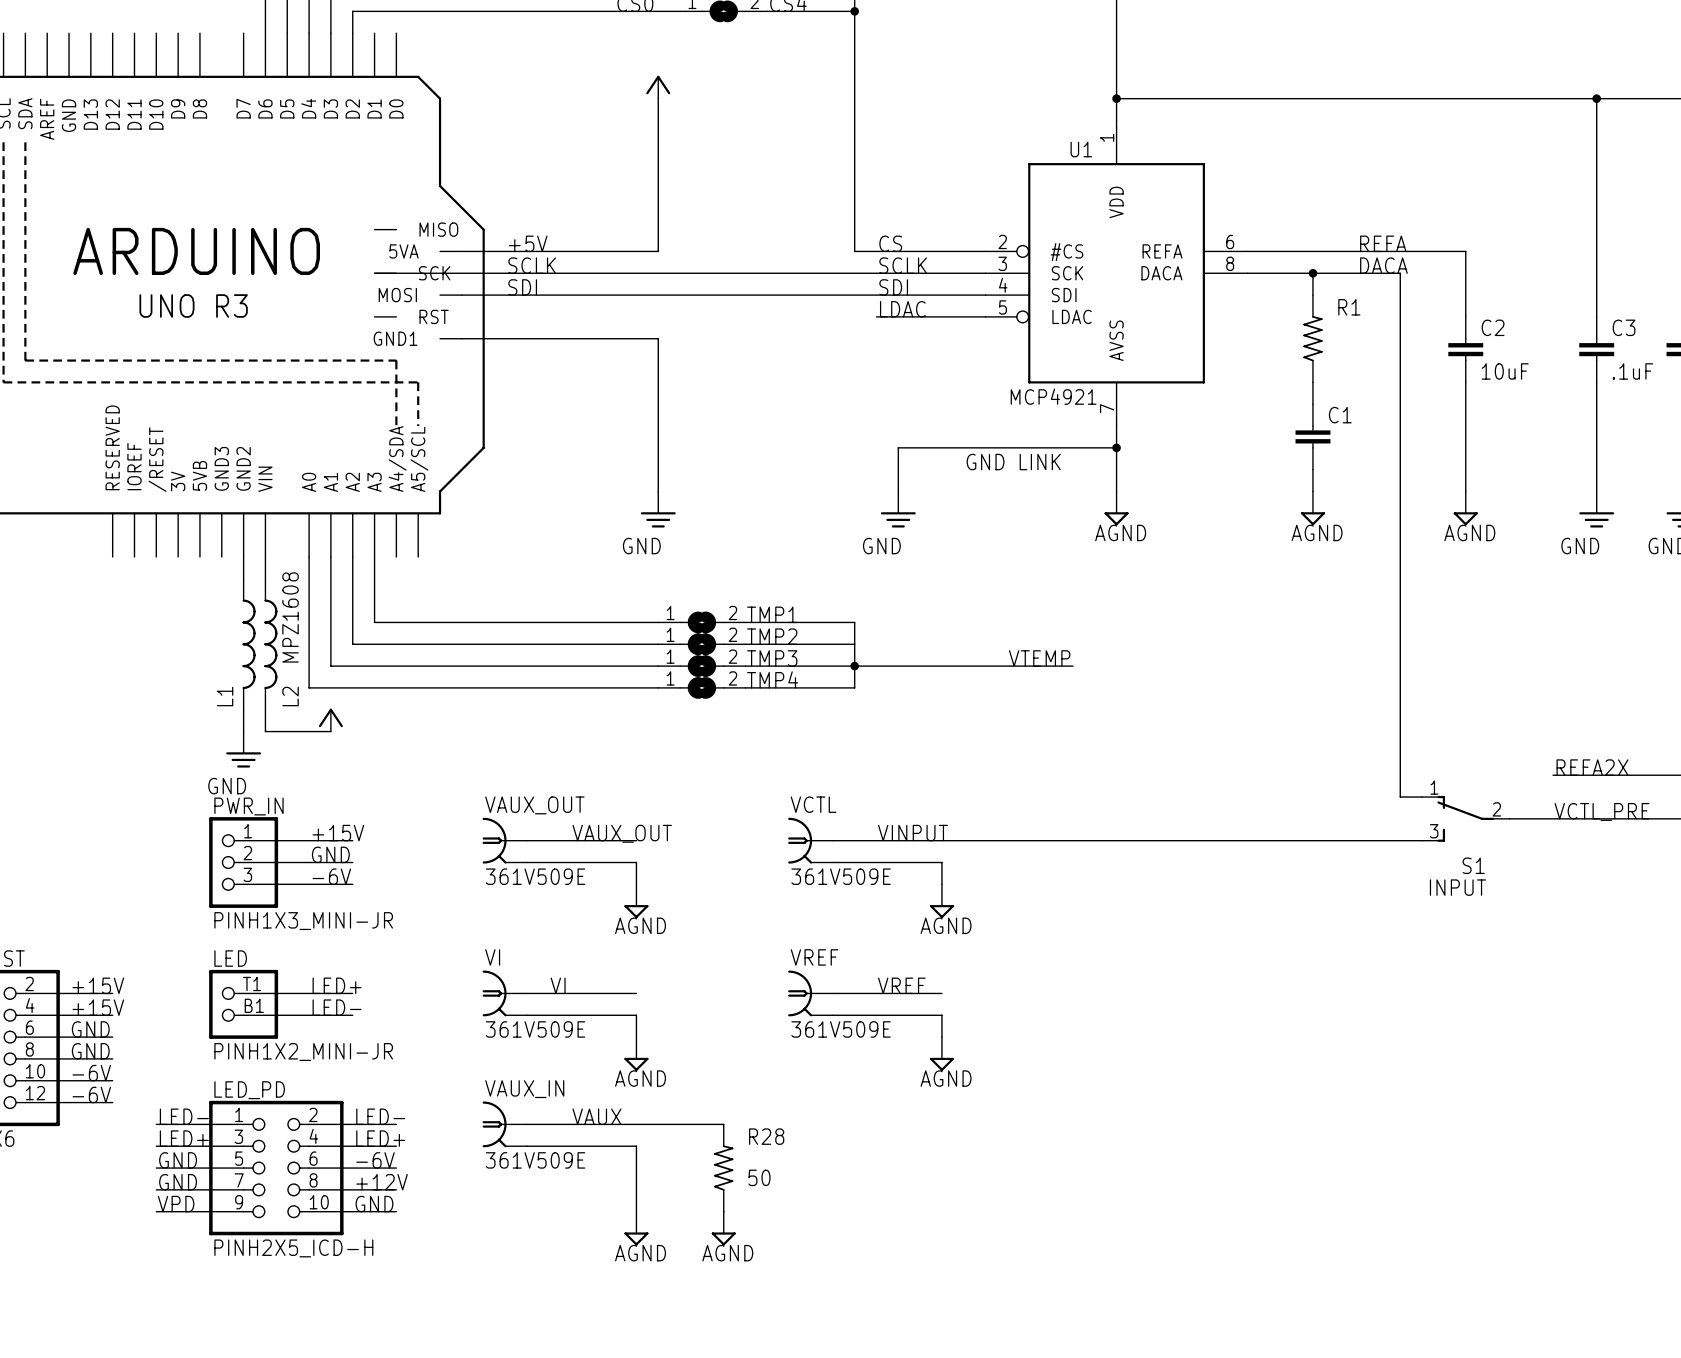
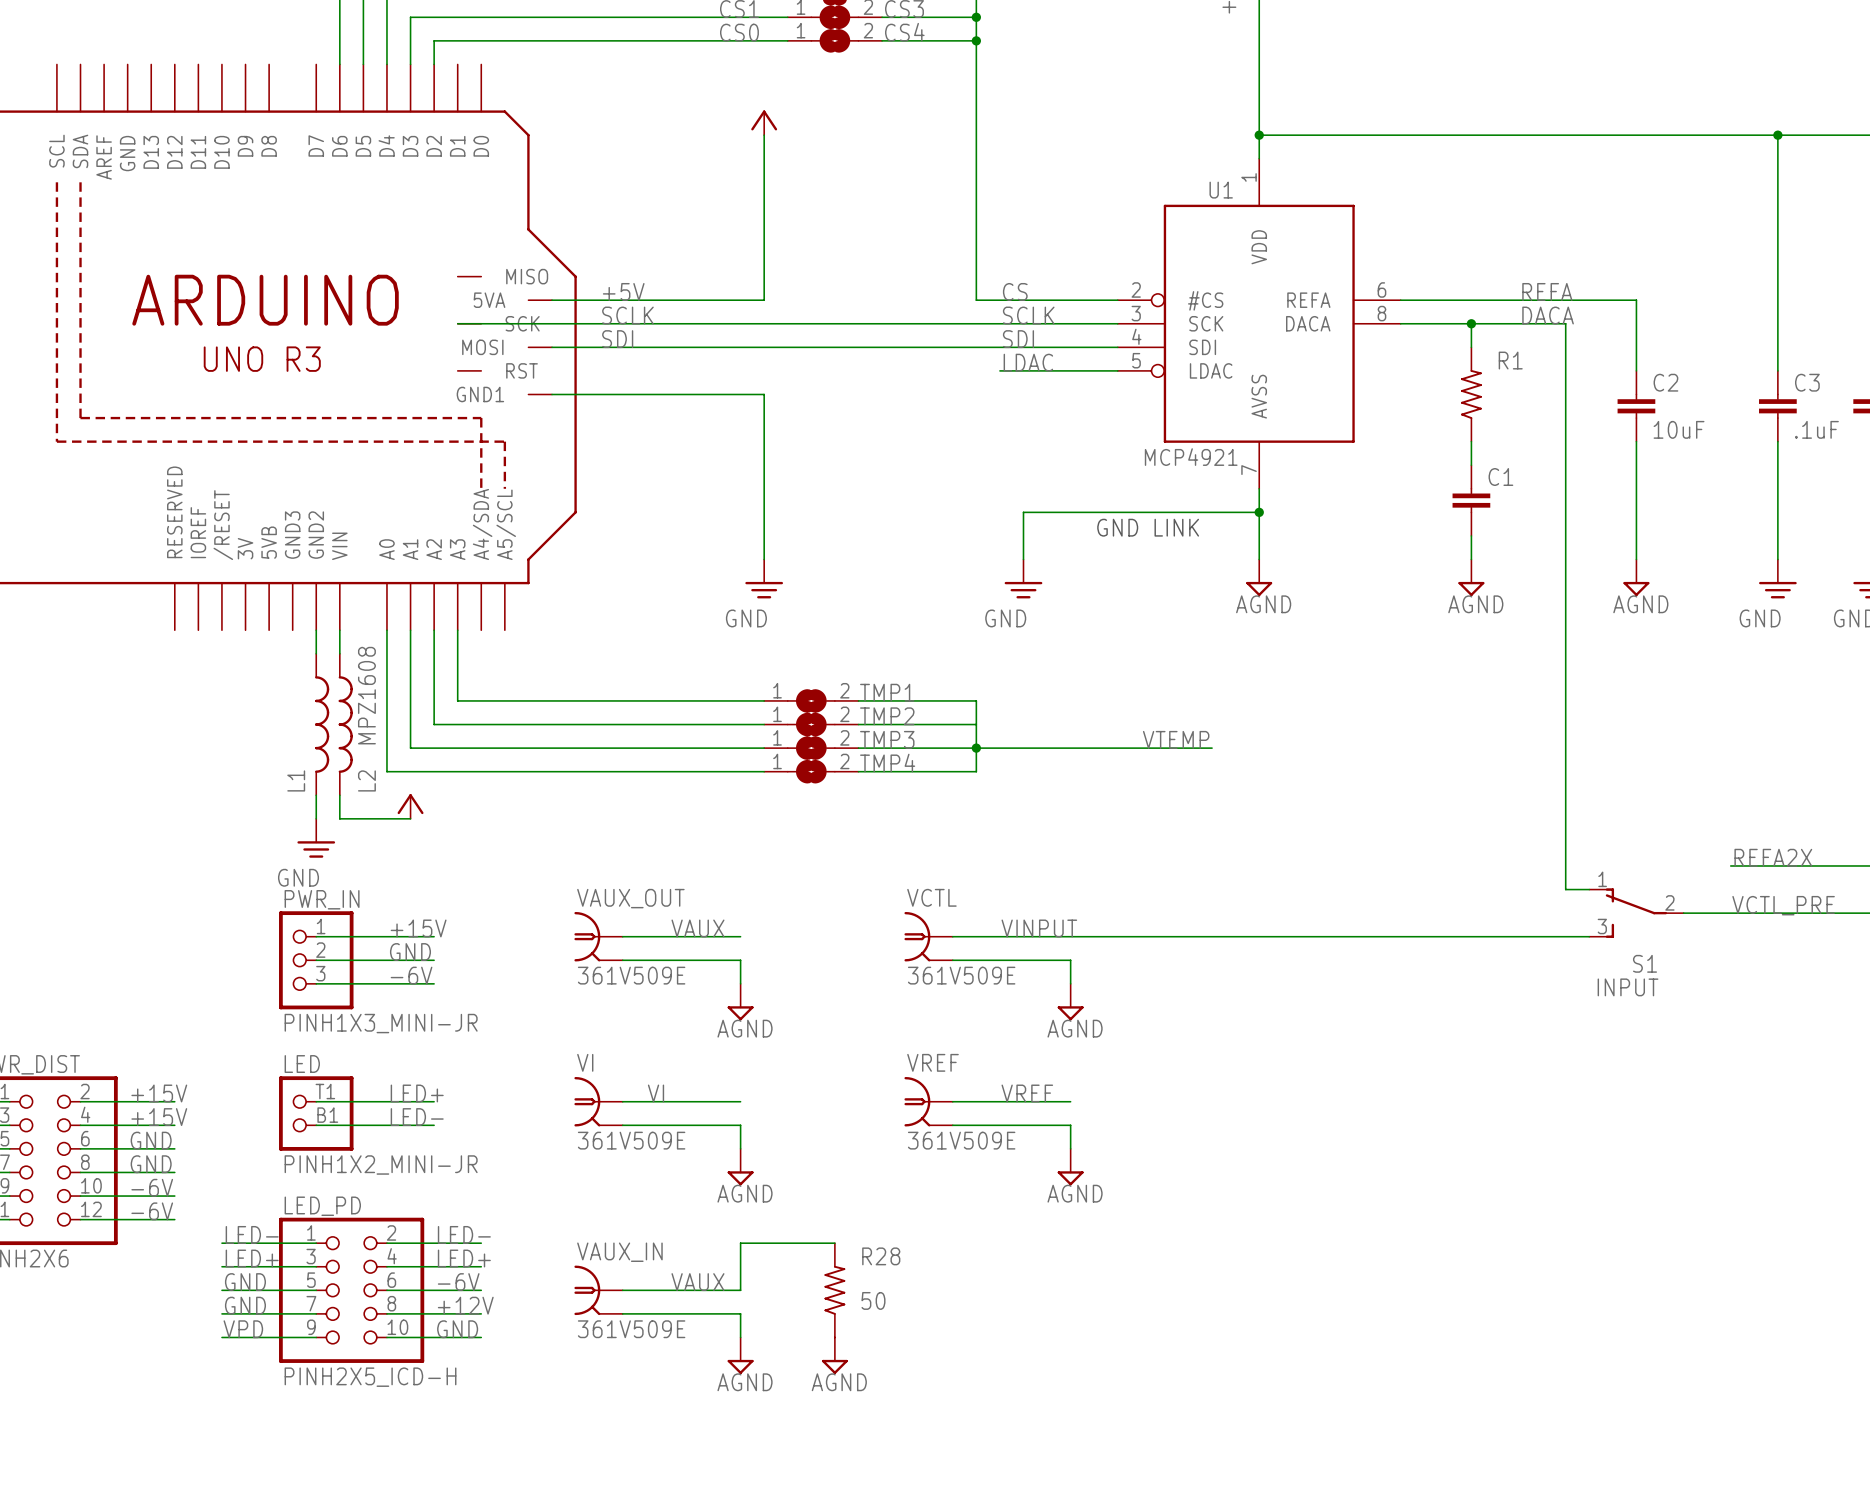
label: VAUX_OUT (622, 833) -> VAUX (697, 928)
label position: VAUX (596, 1116) -> VAUX (697, 1282)
VAUX_IN position: (504, 1124) -> (598, 1290)
wire: (527, 1124) (636, 1124) -> (740, 1266) (740, 1243)
wire: (527, 1146) (636, 1146) -> (622, 1313) (740, 1313)
wire: (636, 1168) (636, 1189) -> (740, 1290) (622, 1290)

